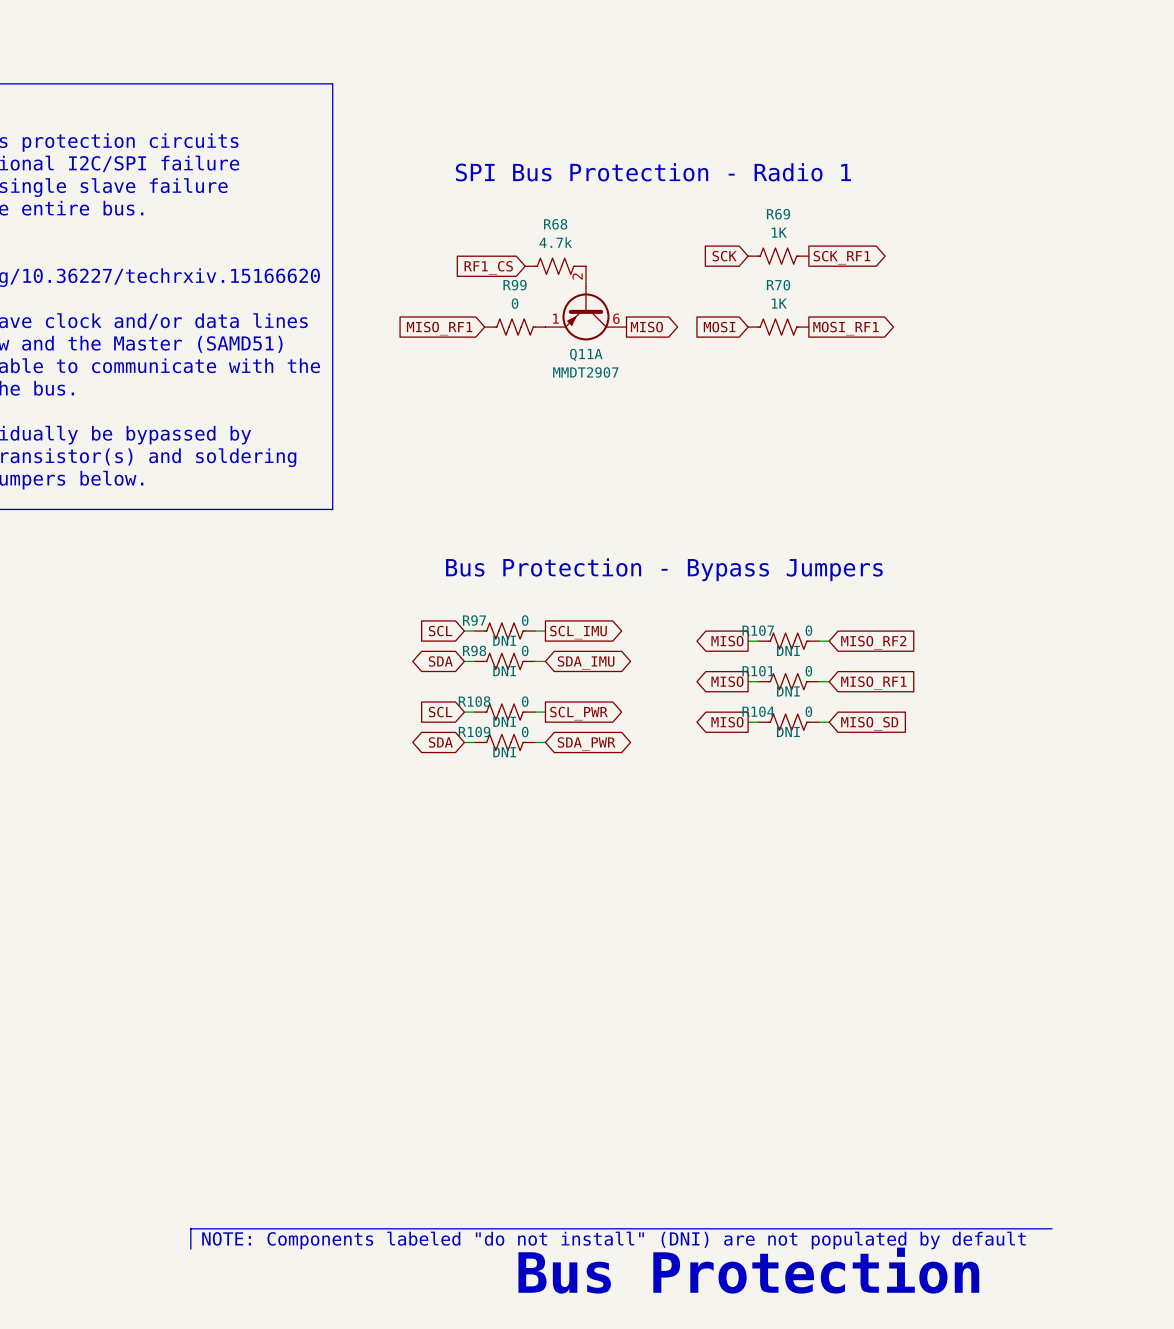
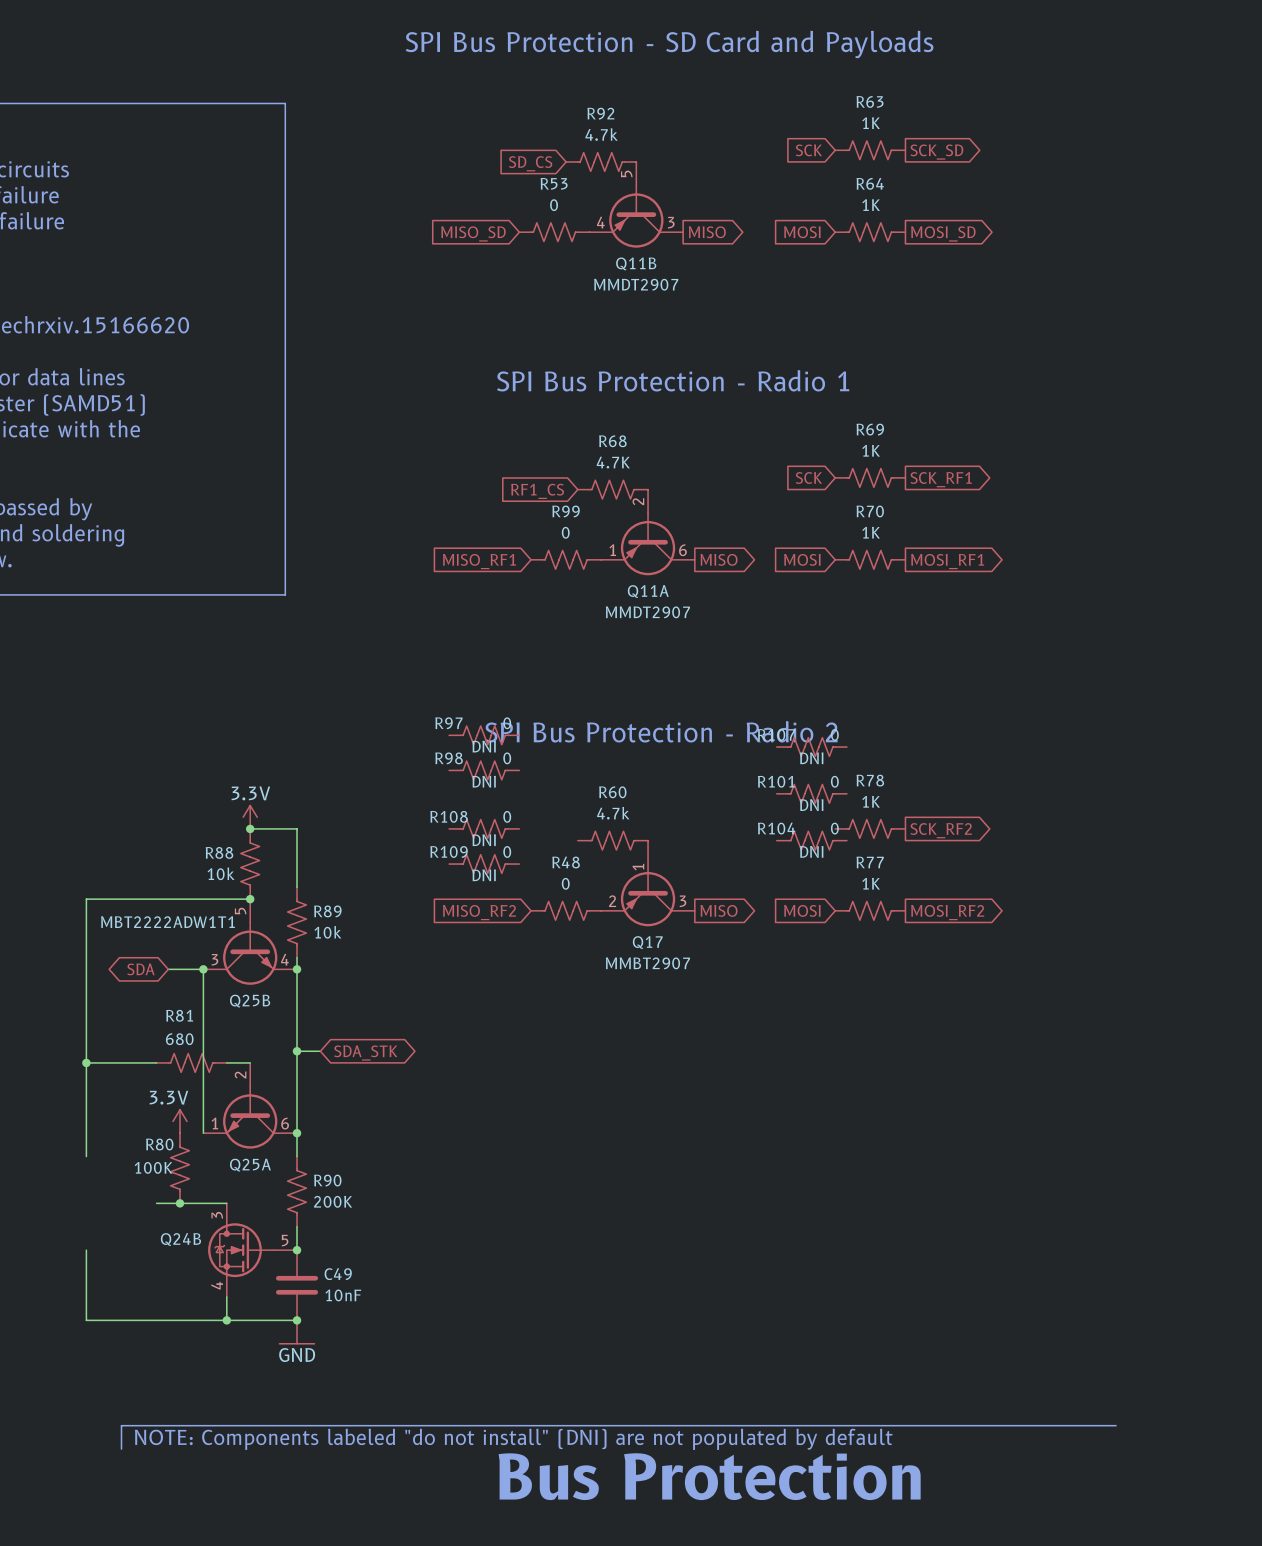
text: none -> SPI Bus Protection - SD Card and Payloads (669, 44)
global label: none -> SCK (808, 150)
R63: none -> 1K (870, 150)
global label: none -> SCK_SD (936, 152)
R92: none -> 4.7k (601, 161)
global label: none -> SD_CS (530, 163)
Q11B: none -> MMDT2907 (636, 204)
text position: SPI Bus Protection - Radio 1 (653, 172) -> SPI Bus Protection - Radio 1 (673, 380)
R53: none -> 0 (554, 232)
global label: none -> MISO (707, 232)
global label: none -> MOSI (802, 232)
R64: none -> 1K (870, 232)
global label: none -> MISO_SD (473, 233)
global label: none -> MOSI_SD (943, 233)
R68 value: 4.7k (555, 242) -> 4.7K (613, 462)
global label: SCK (724, 256) -> none
R69 position: (778, 256) -> (870, 477)
global label position: SCK_RF1 (841, 257) -> SCK_RF1 (941, 479)
R68 position: (555, 266) -> (612, 489)
global label position: RF1_CS (488, 267) -> RF1_CS (537, 491)
Q11A position: (585, 303) -> (648, 532)
R99 position: (515, 327) -> (566, 559)
global label: MISO (646, 327) -> none
global label: MOSI (719, 327) -> none
R70 position: (778, 327) -> (870, 559)
global label position: MISO_RF1 (439, 328) -> MISO_RF1 (479, 561)
global label position: MOSI_RF1 (845, 328) -> MOSI_RF1 (947, 561)
global label: none -> SCK (808, 477)
global label: none -> MISO (719, 559)
global label: none -> MOSI (802, 559)
text: Bus Protection - Bypass Jumpers (664, 569) -> none
text: none -> SPI Bus Protection - Radio 2 (661, 731)
global label: SCL (440, 631) -> none
wire: (464, 631) (474, 631) -> none
wire: (535, 631) (545, 631) -> none
global label: SCL_IMU (578, 632) -> none
global label: MISO (727, 641) -> none
wire: (748, 641) (758, 641) -> none
wire: (819, 641) (829, 641) -> none
global label: MISO_RF2 (873, 642) -> none
global label: SDA (440, 661) -> none
wire: (464, 661) (474, 661) -> none
wire: (535, 661) (545, 661) -> none
global label: SDA_IMU (586, 662) -> none
global label: MISO (727, 681) -> none
wire: (748, 681) (758, 681) -> none
wire: (819, 681) (829, 681) -> none
global label: MISO_RF1 (873, 683) -> none
power symbol: none -> 3.3V (250, 817)
wire: none -> (250, 828) (297, 828) (297, 887)
junction: none -> (250, 828)
global label: SCL (440, 712) -> none
wire: (464, 712) (474, 712) -> none
wire: (535, 712) (545, 712) -> none
R78: none -> 1K (870, 828)
global label: SCL_PWR (579, 713) -> none
global label: none -> SCK_RF2 (941, 830)
R60: none -> 4.7k (612, 840)
global label: MISO (727, 722) -> none
wire: (748, 722) (758, 722) -> none
wire: (819, 722) (829, 722) -> none
global label: MISO_SD (869, 723) -> none
R88: none -> 10k (250, 864)
global label: SDA (440, 742) -> none
wire: (464, 742) (474, 742) -> none
wire: (535, 742) (545, 742) -> none
global label: SDA_PWR (586, 744) -> none
Q17: none -> MMBT2907 (648, 883)
wire: none -> (250, 899) (86, 899) (86, 1156)
junction: none -> (250, 899)
R48: none -> 0 (566, 910)
global label: none -> MISO (719, 910)
global label: none -> MOSI (802, 910)
R77: none -> 1K (870, 910)
global label: none -> MISO_RF2 (479, 912)
global label: none -> MOSI_RF2 (947, 912)
R89: none -> 10k (297, 922)
Q25B: none -> MBT2222ADW1T1 (250, 941)
wire: none -> (297, 957) (297, 1156)
global label: none -> SDA (140, 969)
wire: none -> (168, 969) (203, 969) (203, 1133)
junction: none -> (203, 969)
junction: none -> (297, 969)
wire: none -> (297, 1051) (320, 1051)
junction: none -> (297, 1051)
global label: none -> SDA_STK (365, 1053)
wire: none -> (86, 1062) (156, 1062)
junction: none -> (86, 1062)
R81: none -> 680 (191, 1062)
wire: none -> (226, 1062) (250, 1062)
Q25A: none -> (250, 1105)
power symbol: none -> 3.3V (180, 1121)
junction: none -> (297, 1133)
R80: none -> 100K (180, 1168)
R90: none -> 200K (297, 1191)
wire: none -> (156, 1203) (226, 1203)
junction: none -> (180, 1203)
wire: none -> (297, 1226) (297, 1250)
wire: none -> (86, 1250) (86, 1320) (297, 1320)
Q24B: none -> (252, 1250)
junction: none -> (297, 1250)
C49: none -> 10nF (297, 1285)
wire: none -> (226, 1296) (226, 1320)
junction: none -> (226, 1320)
junction: none -> (297, 1320)
power symbol: none -> GND (297, 1332)

